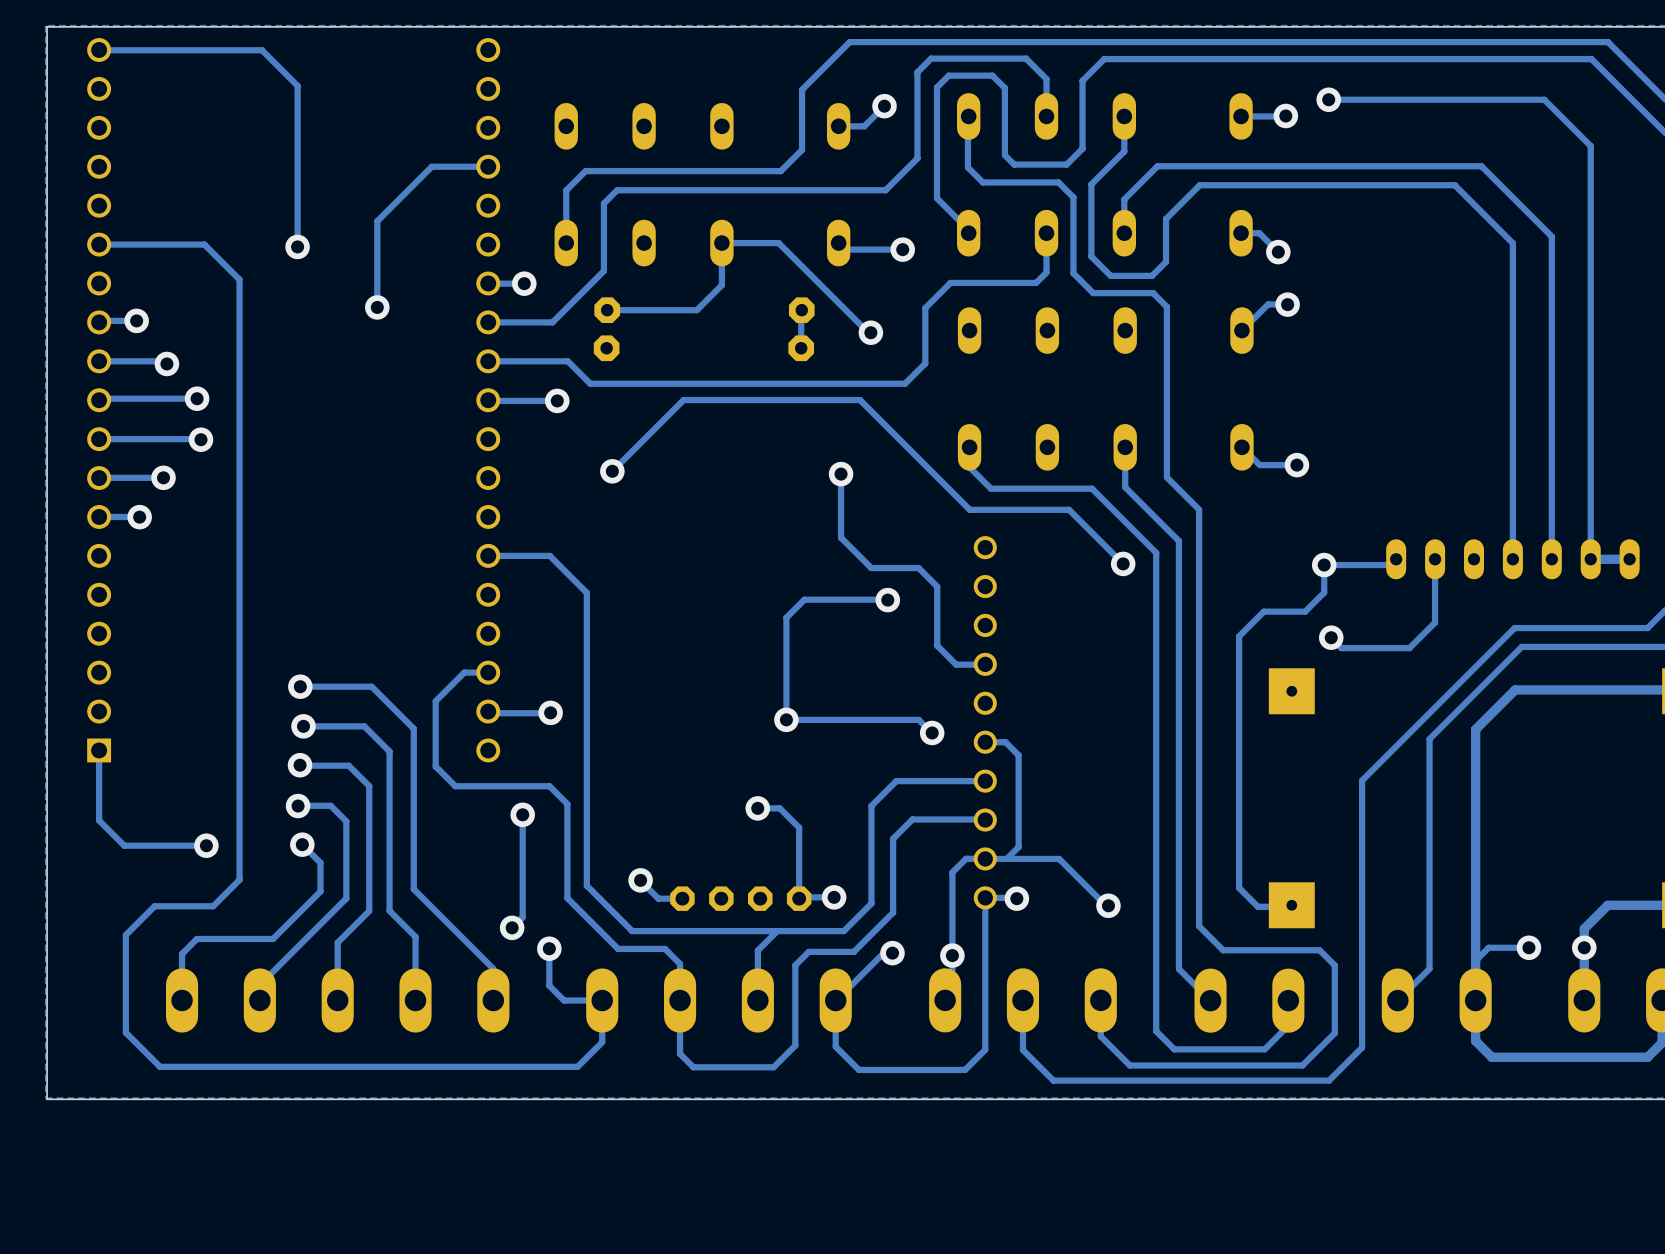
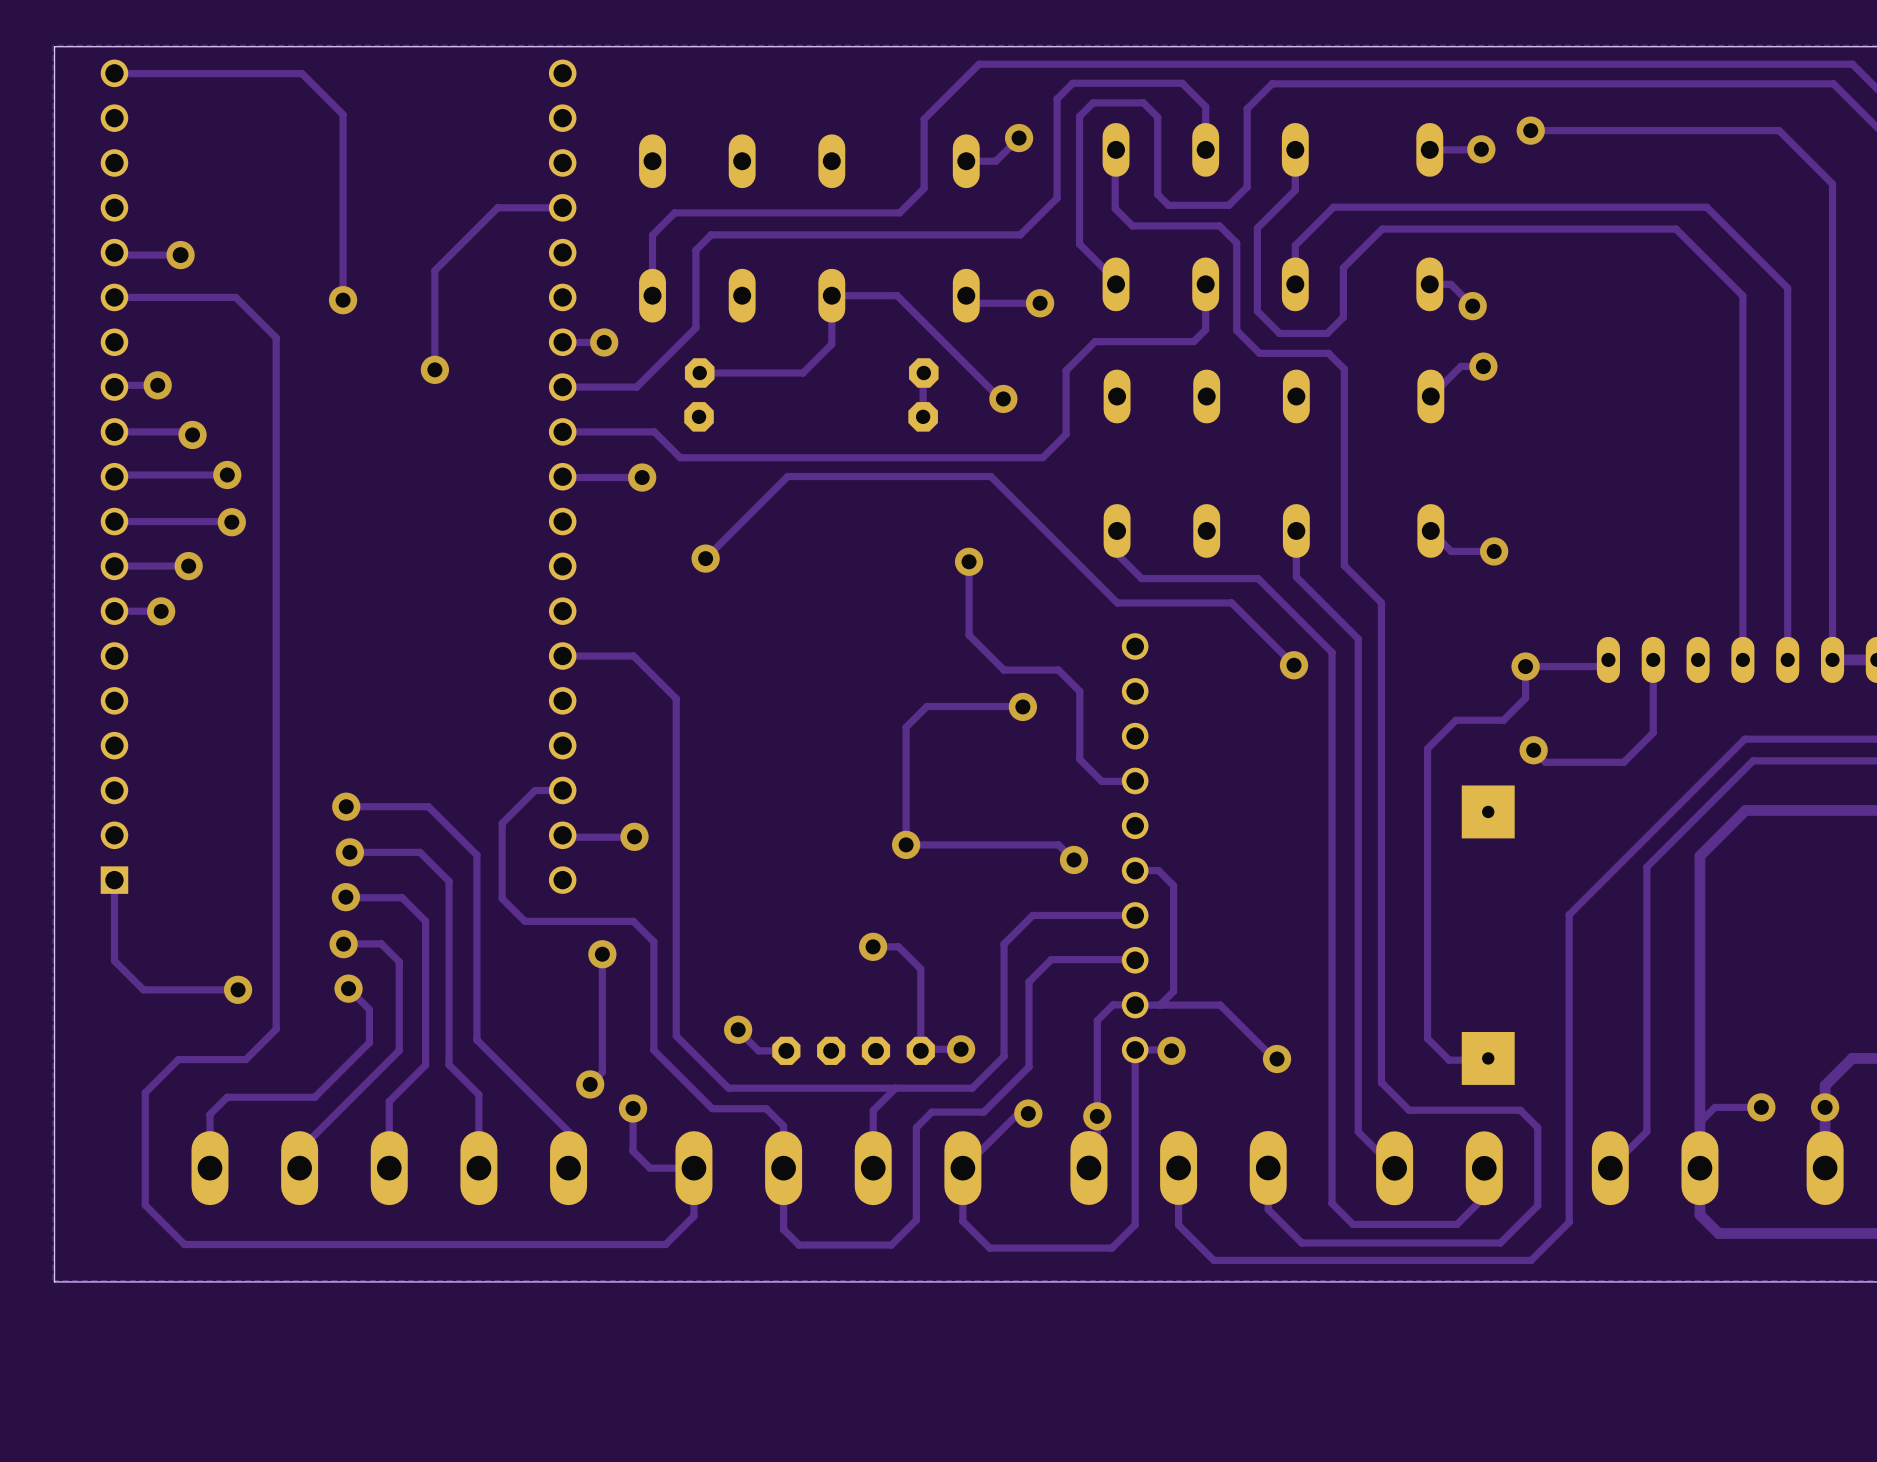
track: none -> (114, 252) (116, 255) (180, 255)
via: none -> (180, 255)

